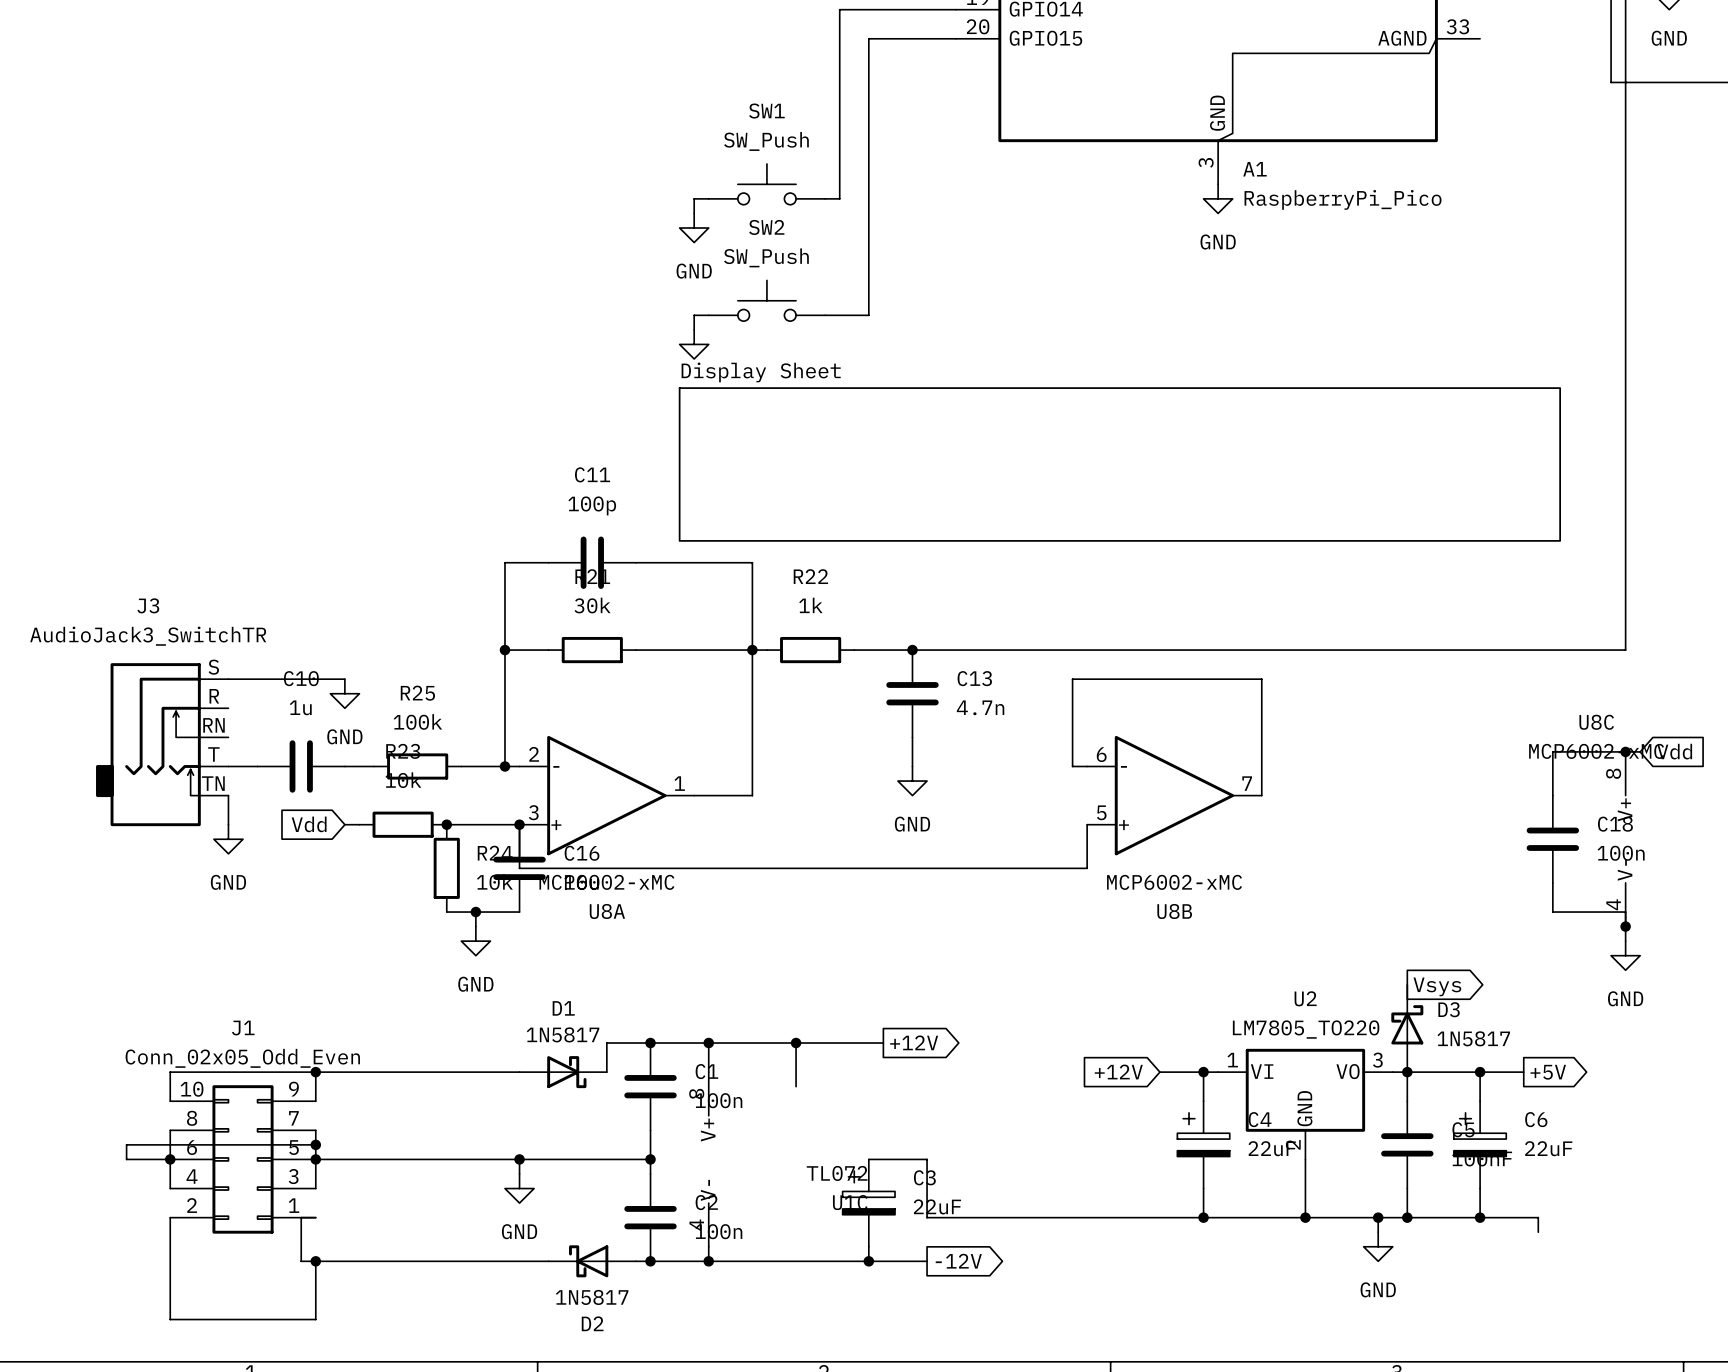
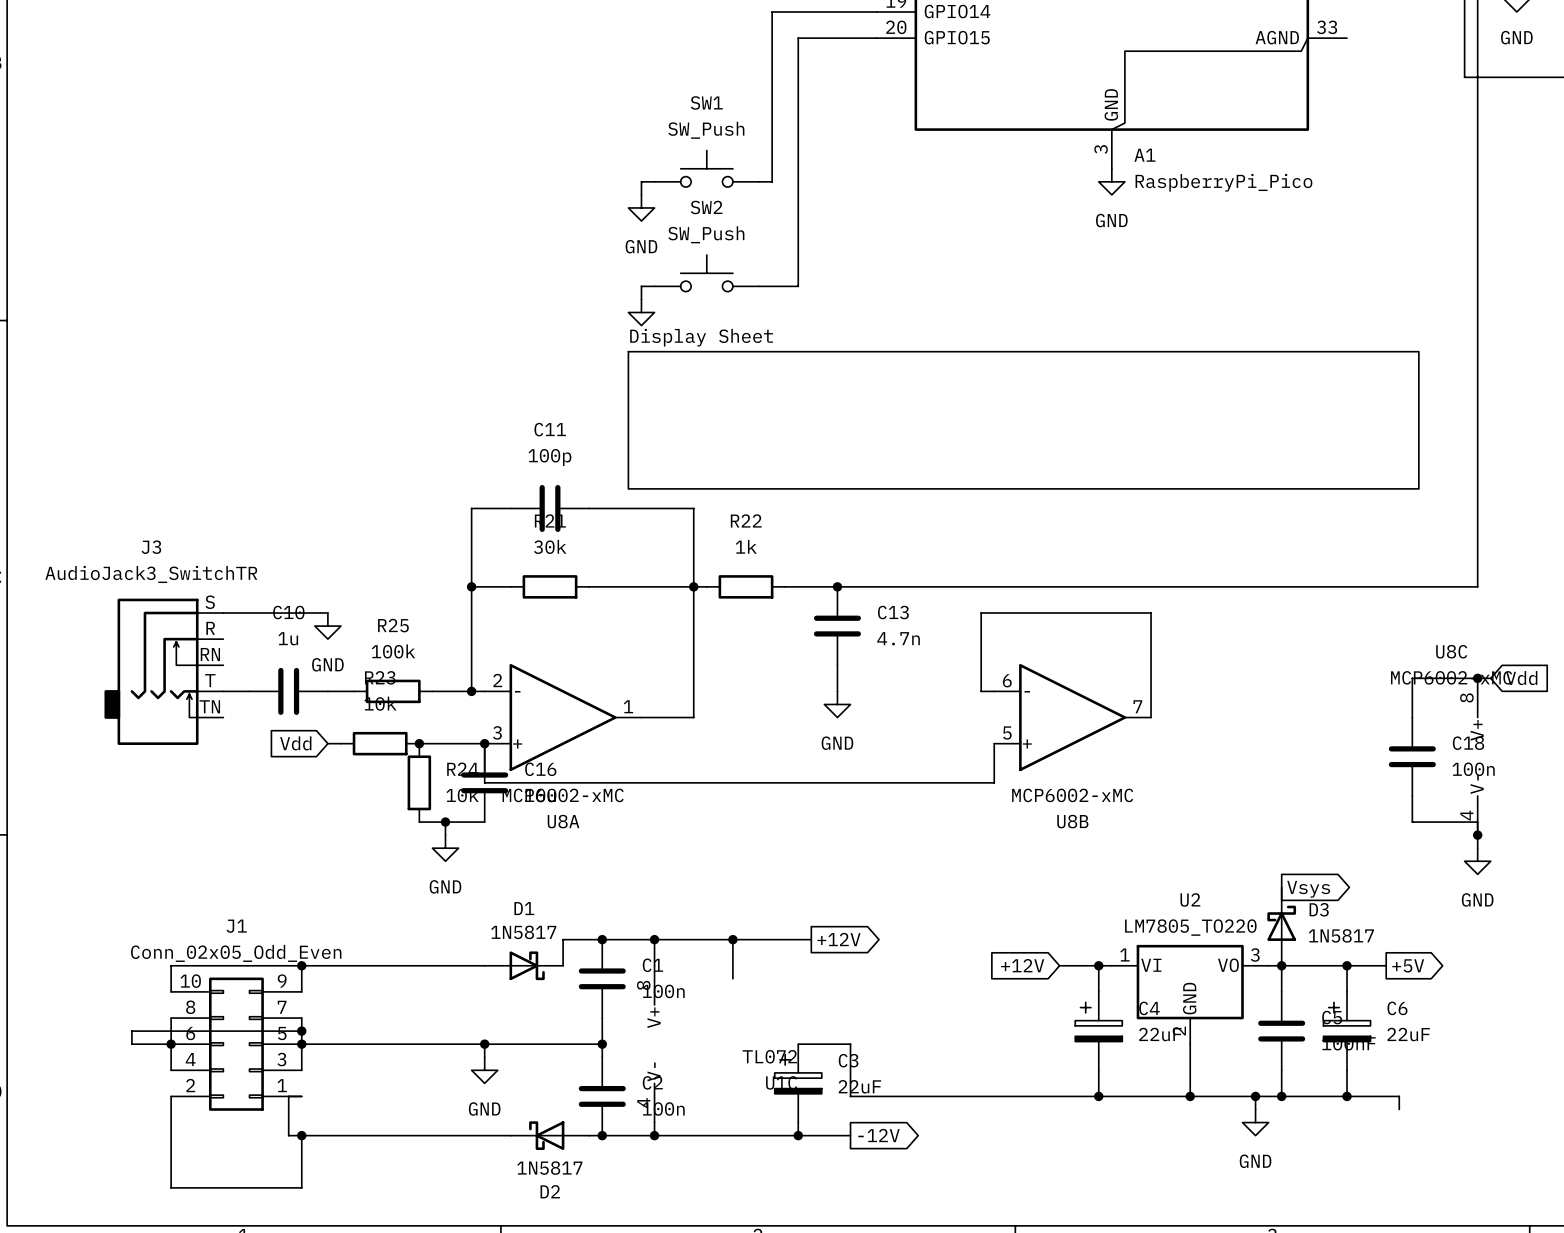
wire: (228, 795) (228, 824) -> none
power symbol: GND (228, 839) -> none

